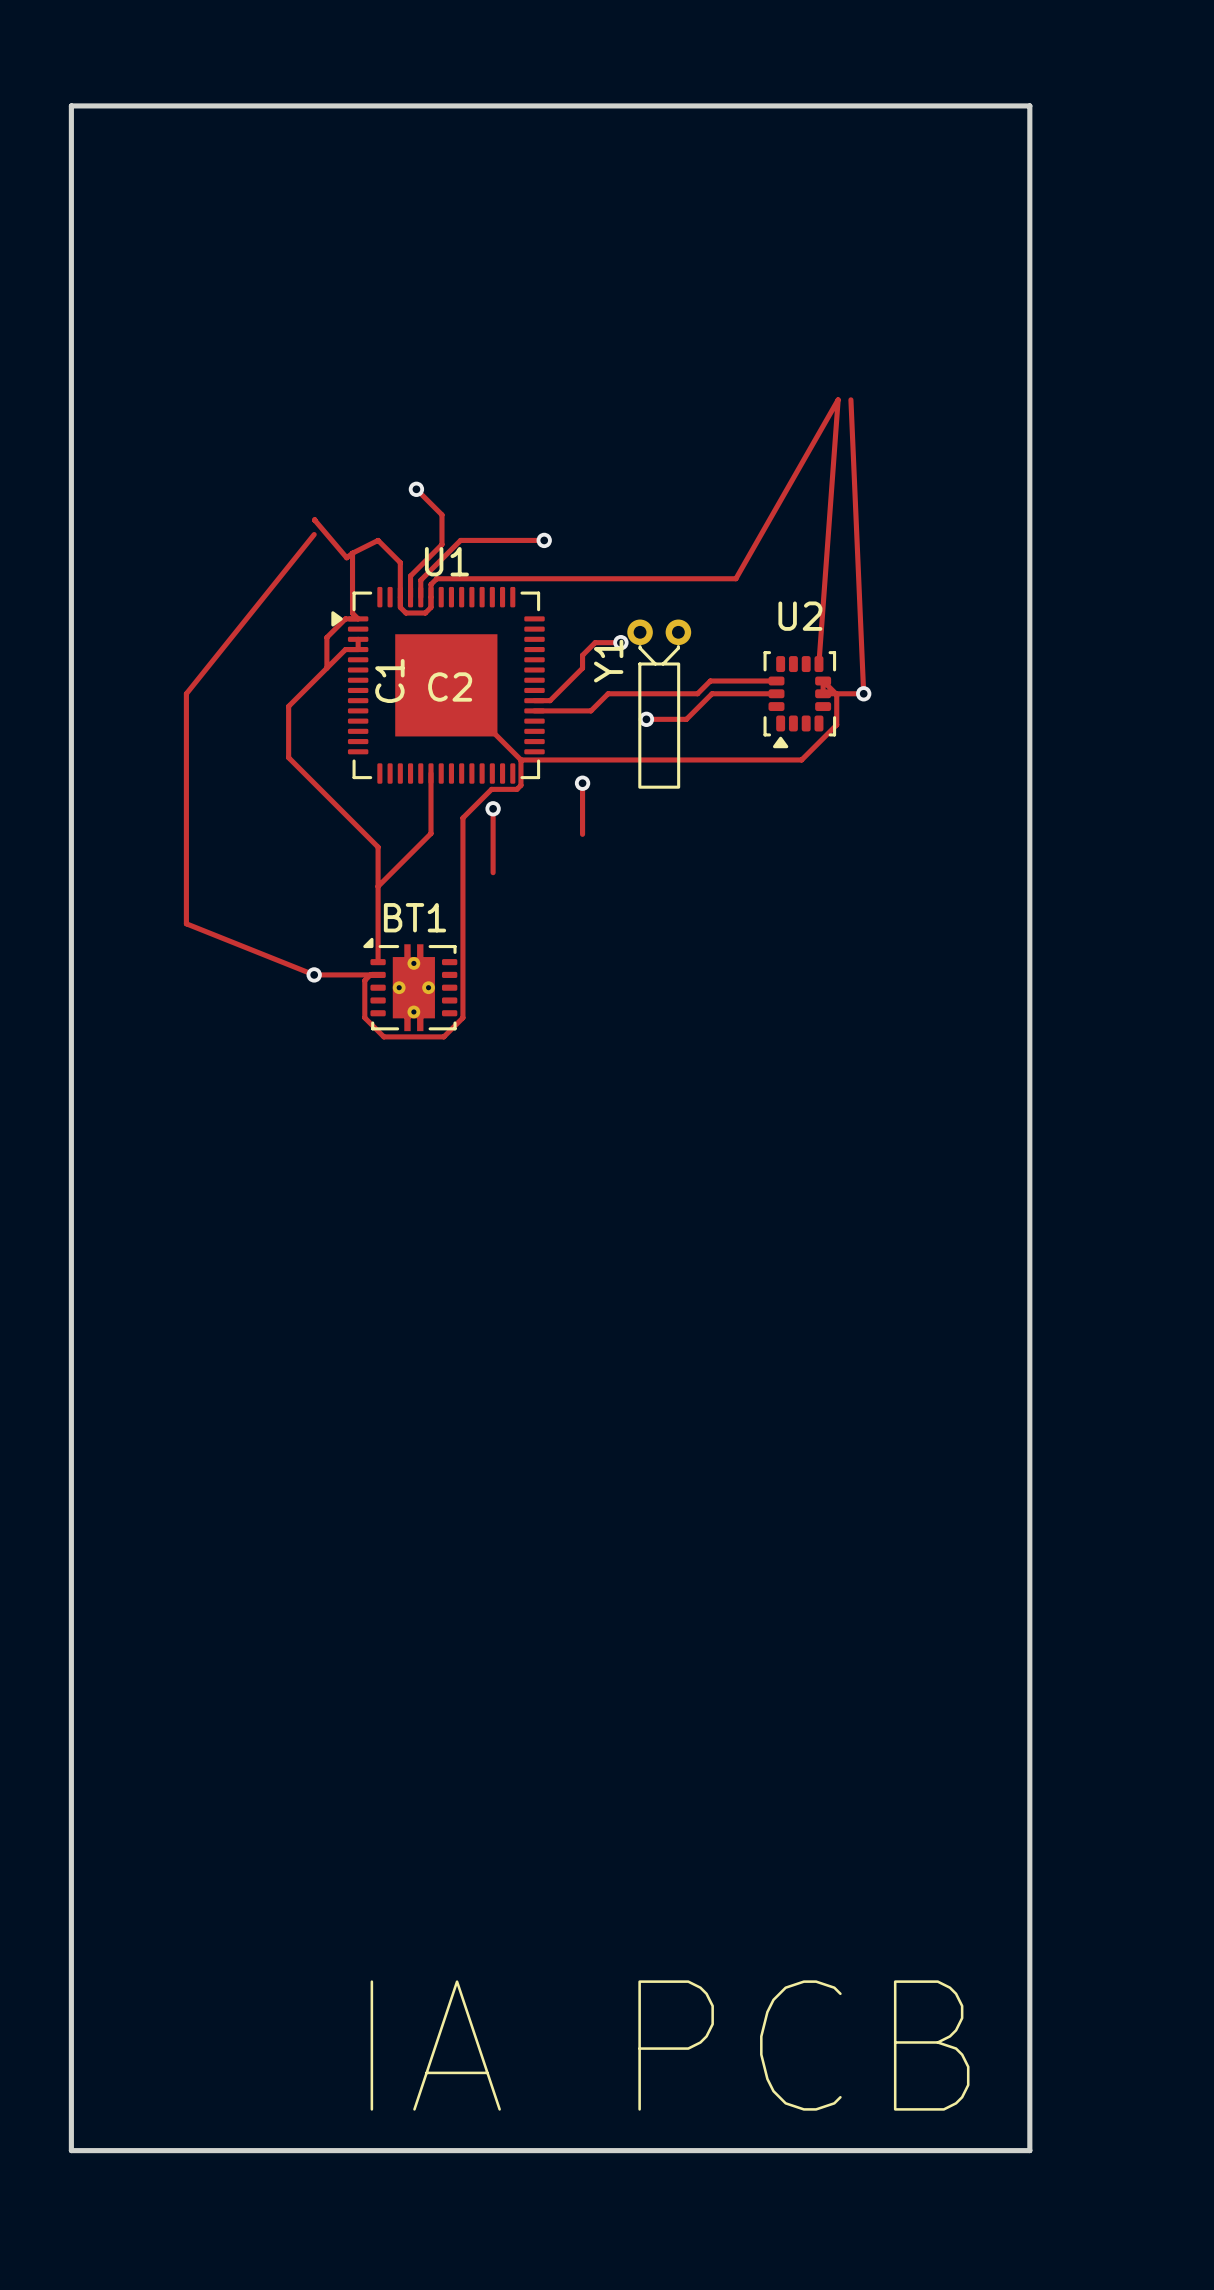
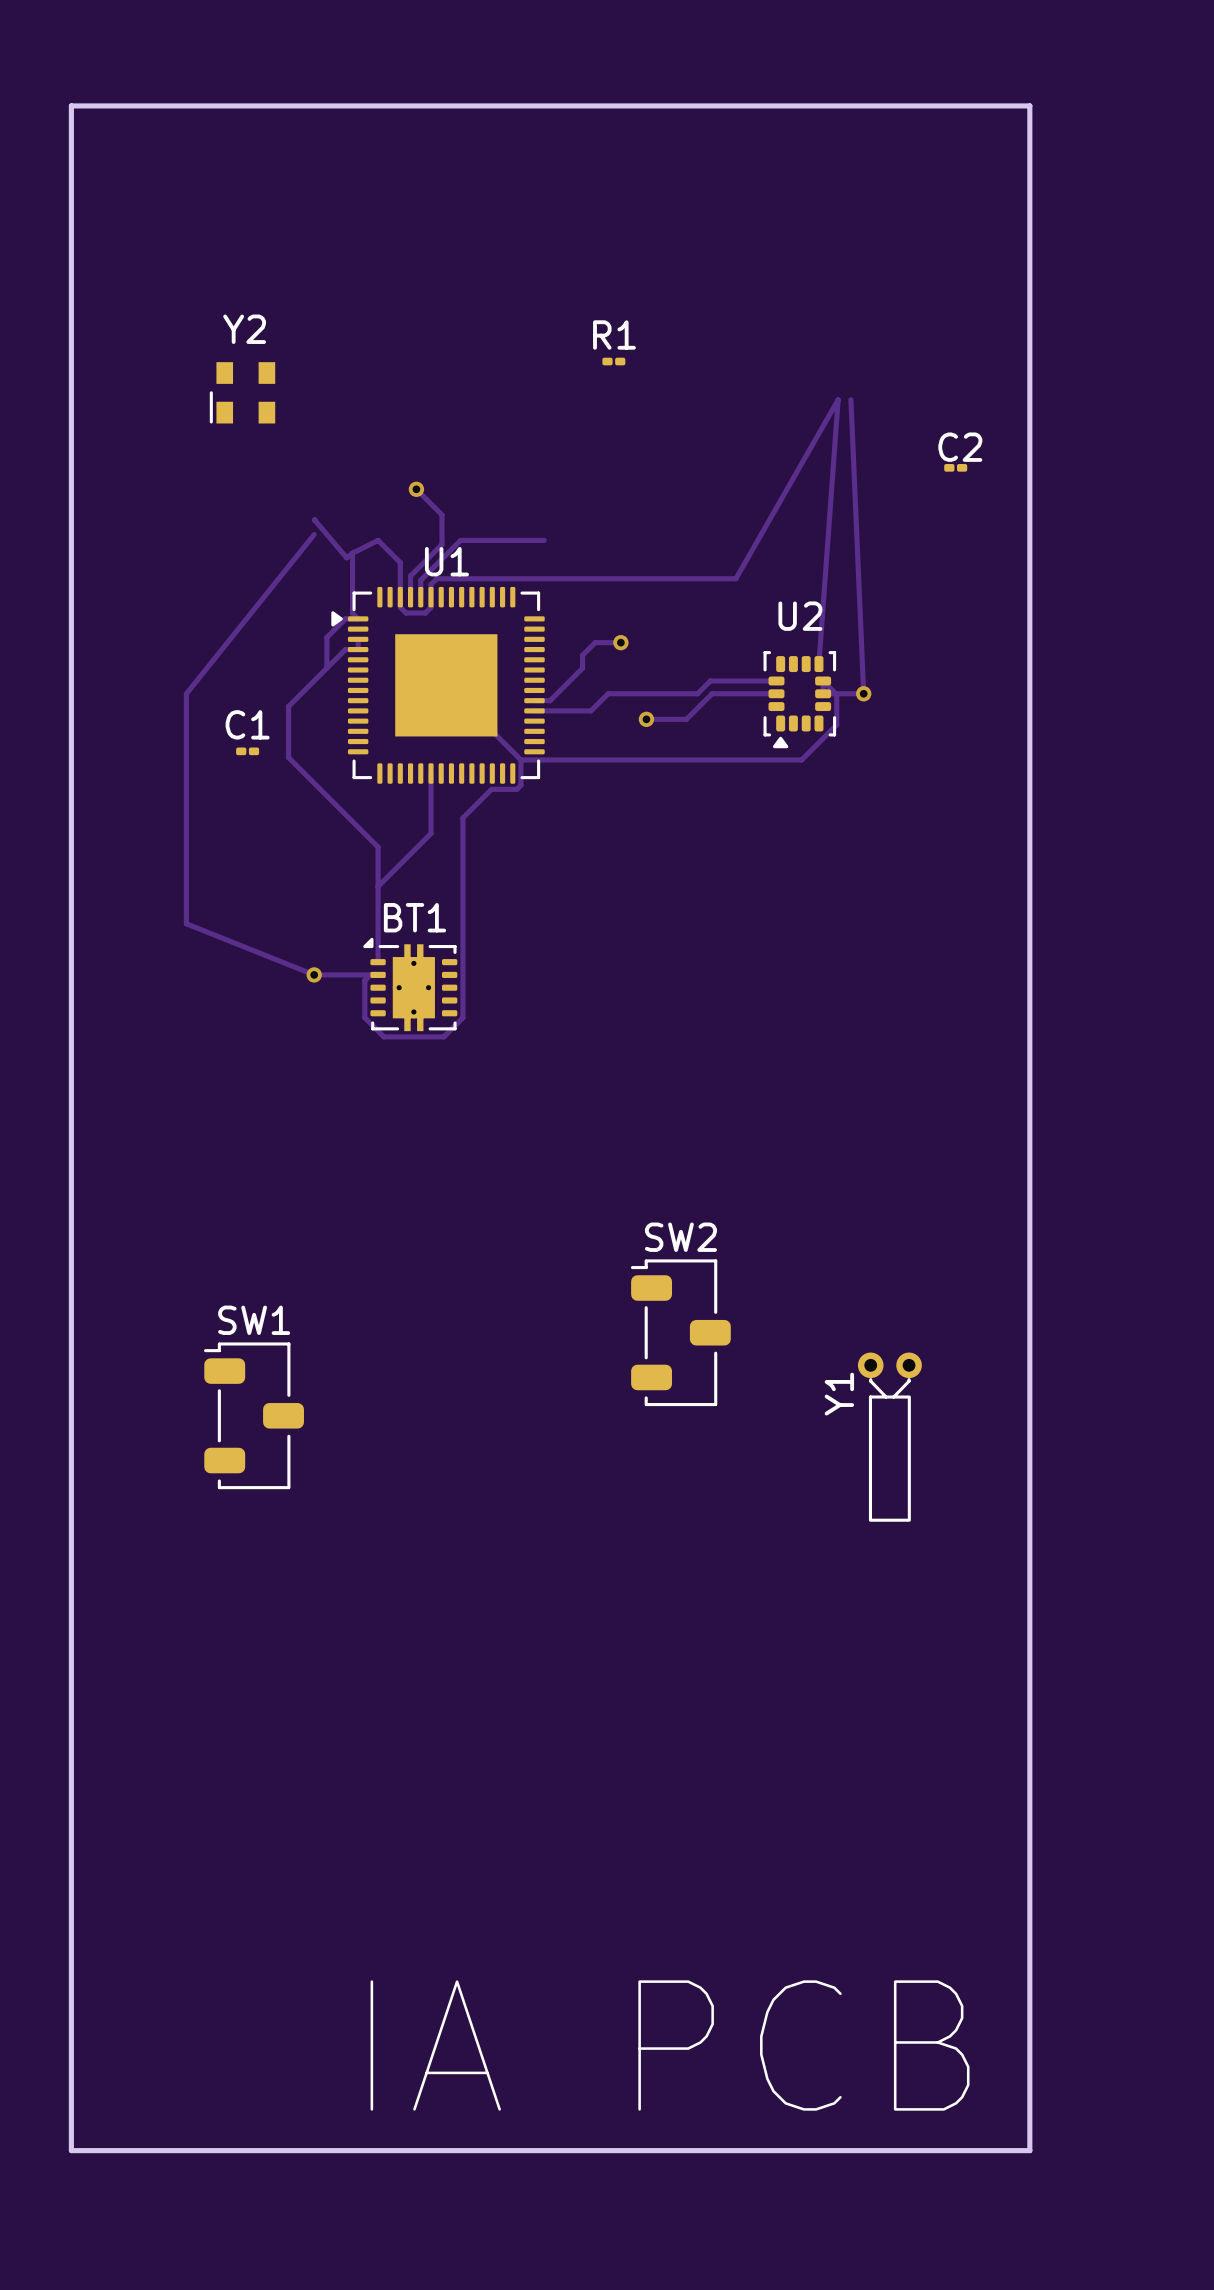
R1: none -> (613, 361)
Y2: none -> (242, 392)
via: (544, 540) -> none
C2 position: (454, 668) -> (955, 467)
C1 rotation: 0° (416, 680) -> 90° clockwise (247, 751)
C1 position: (416, 680) -> (247, 751)
C2 name position: C2 (450, 686) -> C2 (960, 447)
Y1 position: (659, 704) -> (889, 1437)
track: (582, 783) (582, 834) -> none
via: (582, 783) -> none
track: (493, 808) (493, 872) -> none
via: (493, 808) -> none
SW2: none -> (680, 1332)
SW1: none -> (254, 1415)

